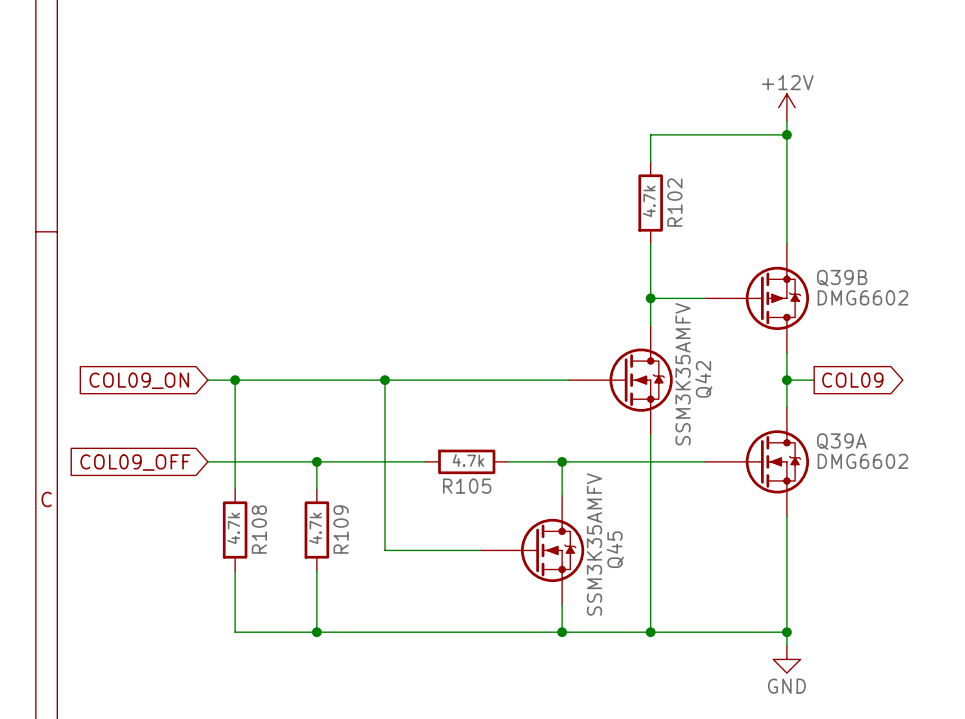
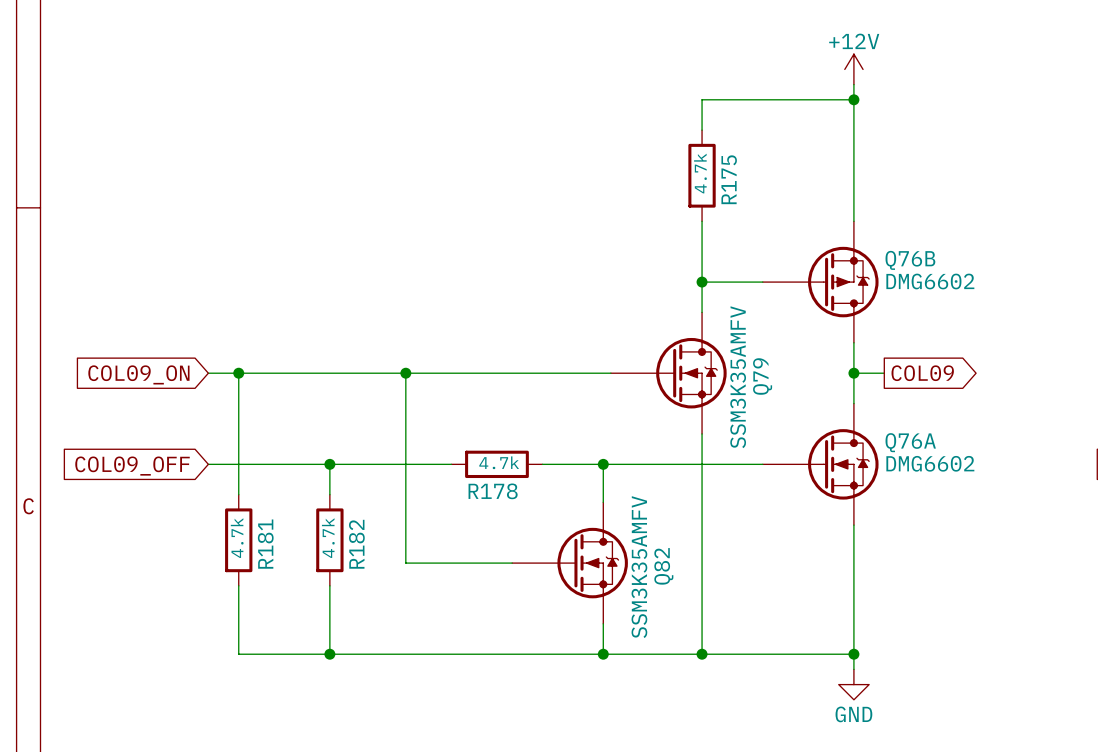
R102 name: R102 (674, 202) -> R175 (729, 179)
Q39B name: Q39B (842, 278) -> Q76B (910, 260)
Q42 name: Q42 (703, 379) -> Q79 (762, 376)
Q39A name: Q39A (841, 441) -> Q76A (910, 442)
R105 name: R105 (467, 486) -> R178 (493, 491)
R108 name: R108 (259, 529) -> R181 (265, 544)
R109 name: R109 (341, 529) -> R182 (356, 544)
Q45 name: Q45 (615, 549) -> Q82 (663, 566)

